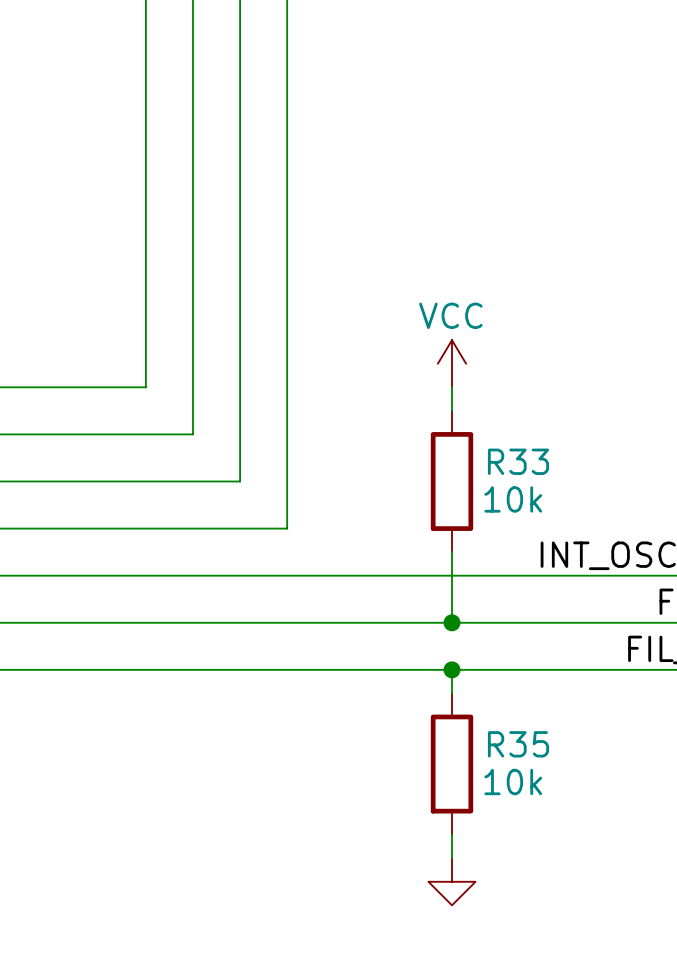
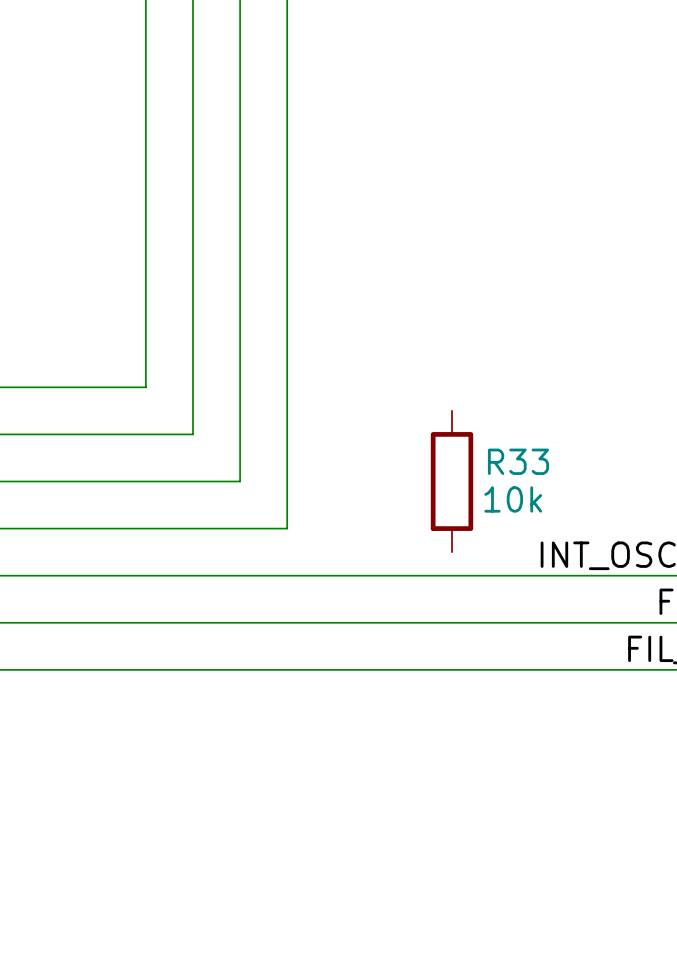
power symbol: VCC (452, 363) -> none
wire: (452, 387) (452, 410) -> none
wire: (452, 552) (452, 622) -> none
junction: (452, 622) -> none
wire: (452, 669) (452, 693) -> none
junction: (452, 669) -> none
R35: 10k (452, 764) -> none
wire: (452, 834) (452, 858) -> none
power symbol: (452, 881) -> none

